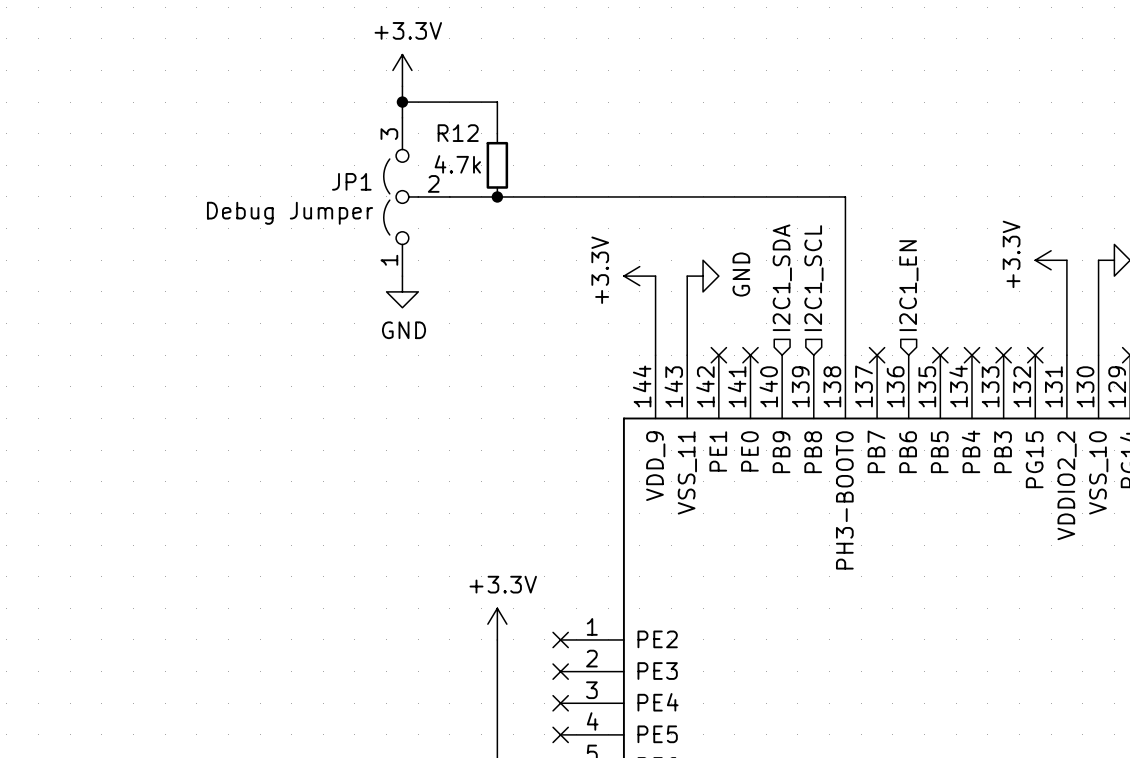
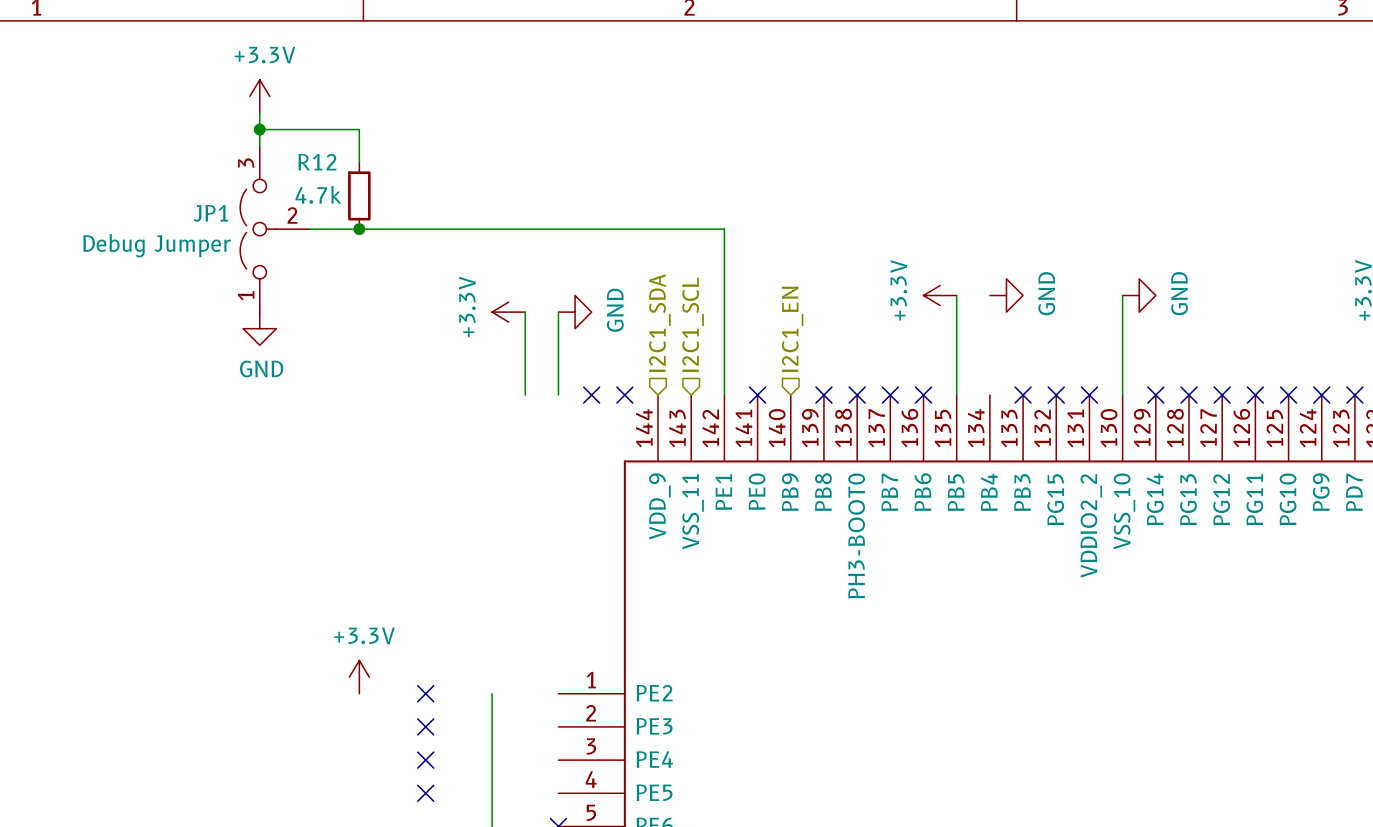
power symbol: none -> +3.3V (259, 96)
power symbol: +3.3V (402, 70) -> none
wire: (402, 86) (402, 117) -> (259, 112) (259, 146)
junction: none -> (259, 129)
wire: (402, 102) (497, 102) (497, 133) -> (259, 129) (359, 129) (359, 162)
junction: (402, 102) -> none
R12 position: (497, 165) -> (359, 195)
wire: none -> (309, 229) (442, 229)
junction: none -> (359, 229)
JP1 position: (416, 196) -> (274, 229)
junction: (497, 196) -> none
wire: (718, 196) (845, 196) (845, 355) -> (724, 229) (724, 395)
power symbol: none -> GND (1006, 295)
power symbol position: +3.3V (1051, 260) -> +3.3V (940, 295)
wire: (1066, 260) (1066, 355) -> (956, 295) (956, 395)
power symbol: none -> +3.3V (508, 312)
power symbol: none -> GND (575, 312)
power symbol: +3.3V (639, 276) -> none
wire: (655, 276) (655, 355) -> (525, 312) (525, 395)
wire: (687, 276) (687, 355) -> (558, 312) (558, 395)
power symbol: GND (703, 276) -> none
hierarchical label: none -> I2C1_SDA (659, 323)
hierarchical label: I2C1_SDA (782, 277) -> I2C1_EN (792, 329)
hierarchical label position: I2C1_SCL (813, 278) -> I2C1_SCL (693, 324)
hierarchical label: I2C1_EN (908, 285) -> none
power symbol: none -> GND (259, 328)
power symbol: GND (402, 291) -> none
no-connect mark: none -> (591, 395)
no-connect mark: none -> (624, 395)
no-connect mark: (718, 355) -> none
no-connect mark: none -> (823, 395)
no-connect mark: none -> (857, 395)
no-connect mark: none -> (923, 395)
no-connect mark: (940, 355) -> none
no-connect mark: (971, 355) -> none
no-connect mark: none -> (1089, 395)
power symbol position: +3.3V (497, 624) -> +3.3V (359, 677)
no-connect mark: none -> (425, 693)
no-connect mark: (560, 639) -> none
no-connect mark: none -> (425, 726)
no-connect mark: (560, 671) -> none
no-connect mark: none -> (425, 760)
no-connect mark: (560, 703) -> none
no-connect mark: none -> (425, 793)
no-connect mark: (560, 734) -> none

